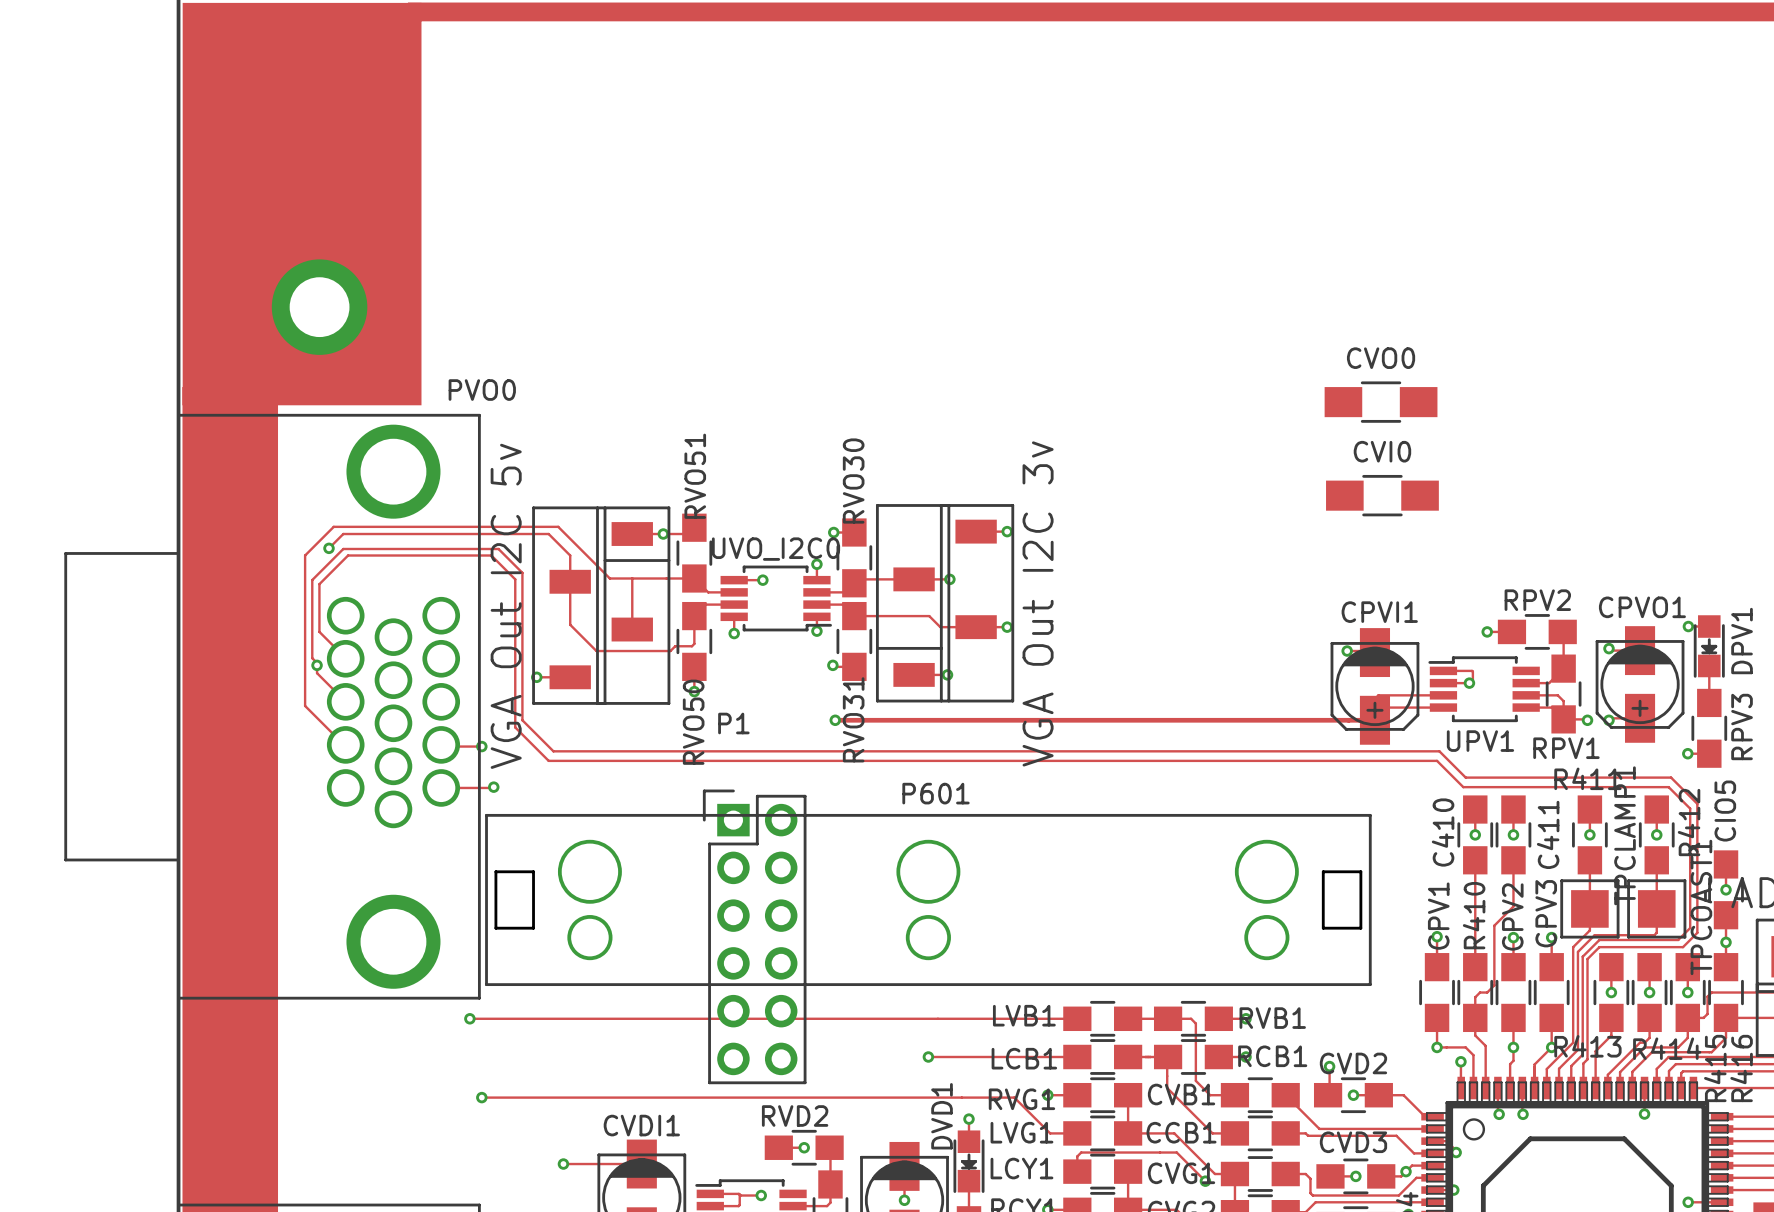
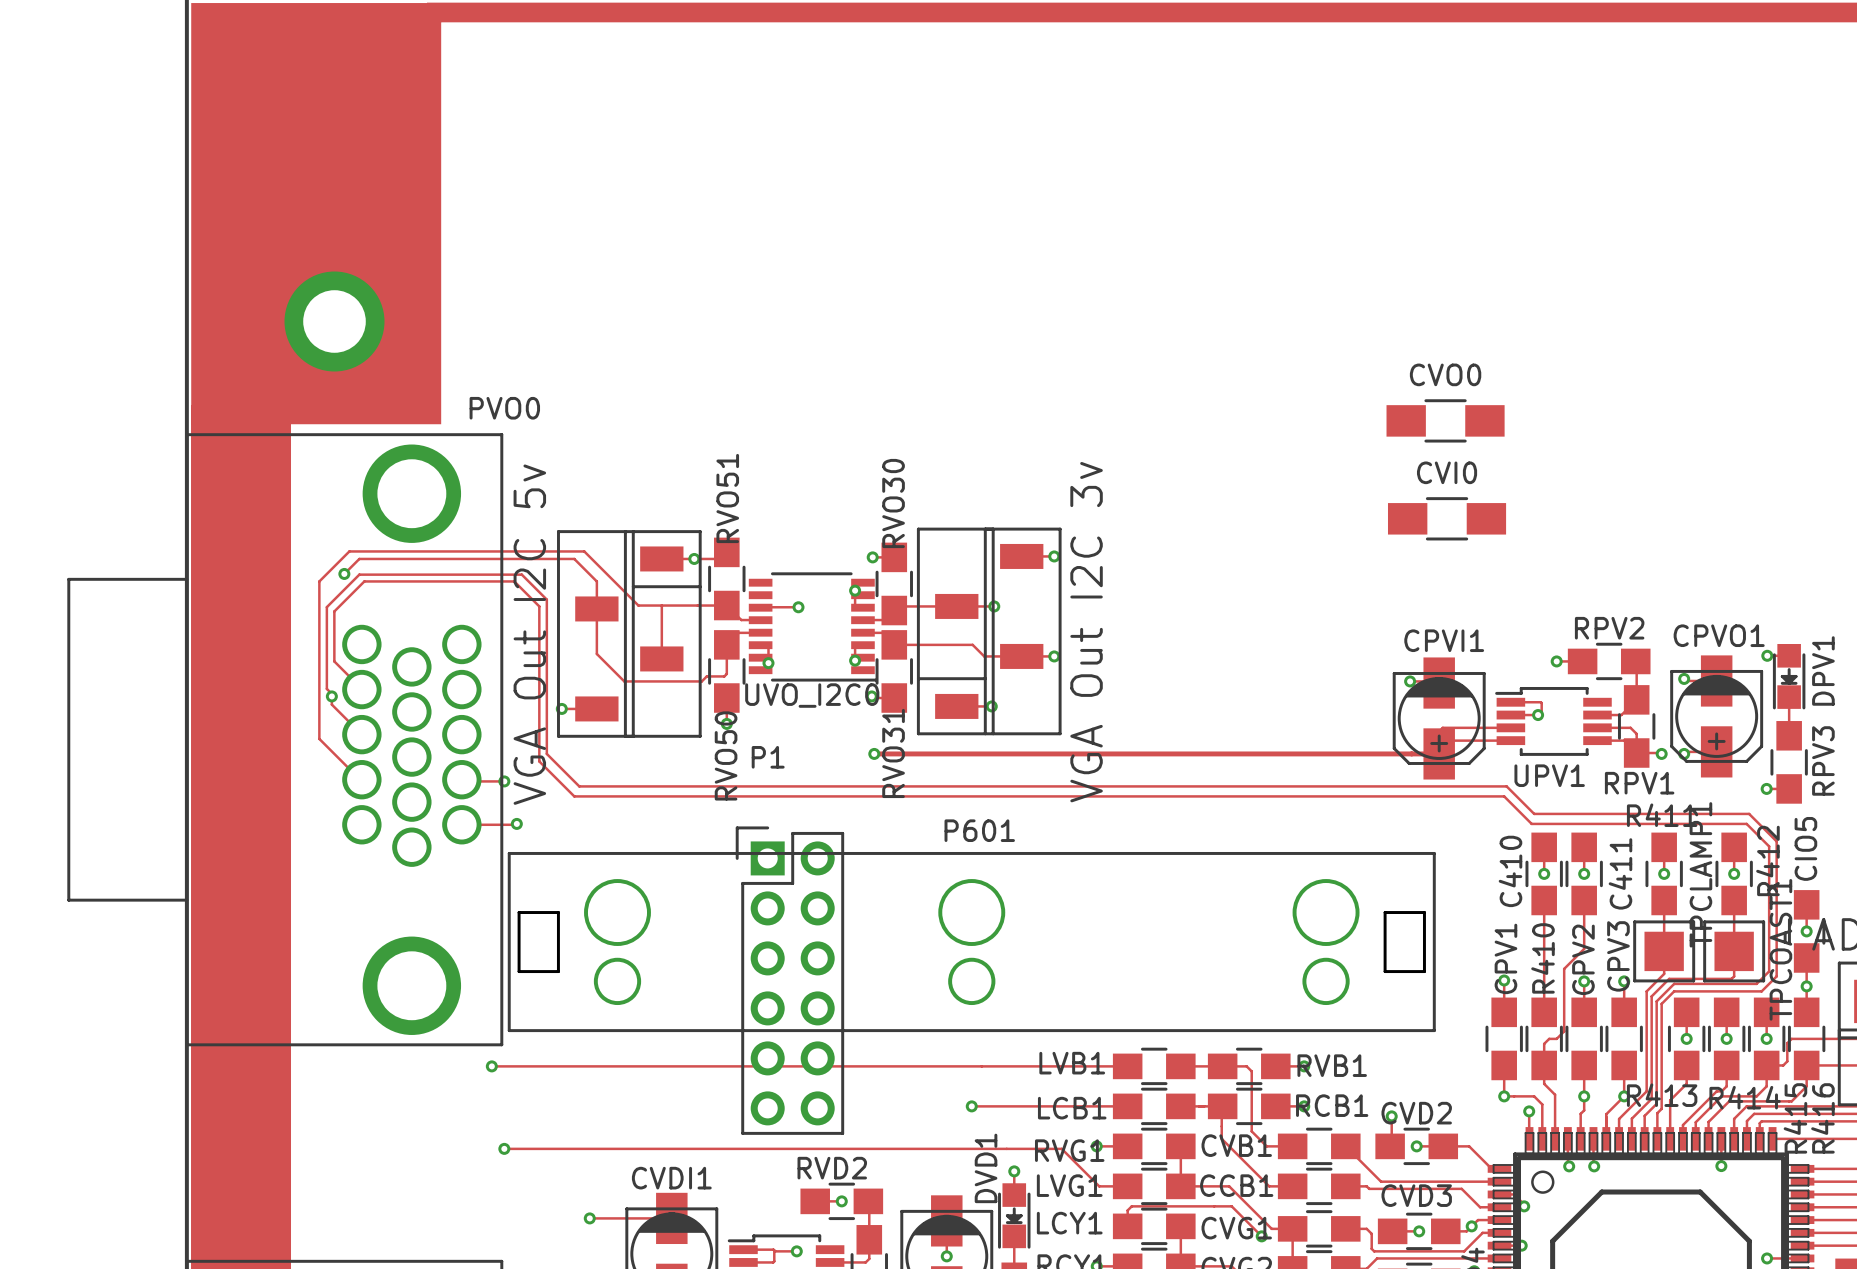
UVO_I2C0 name position: UVO_I2C0 (776, 549) -> UVO_I2C0 (812, 695)
UVO_I2C0 footprint: [720, 565, 832, 632] -> [748, 572, 878, 682]

